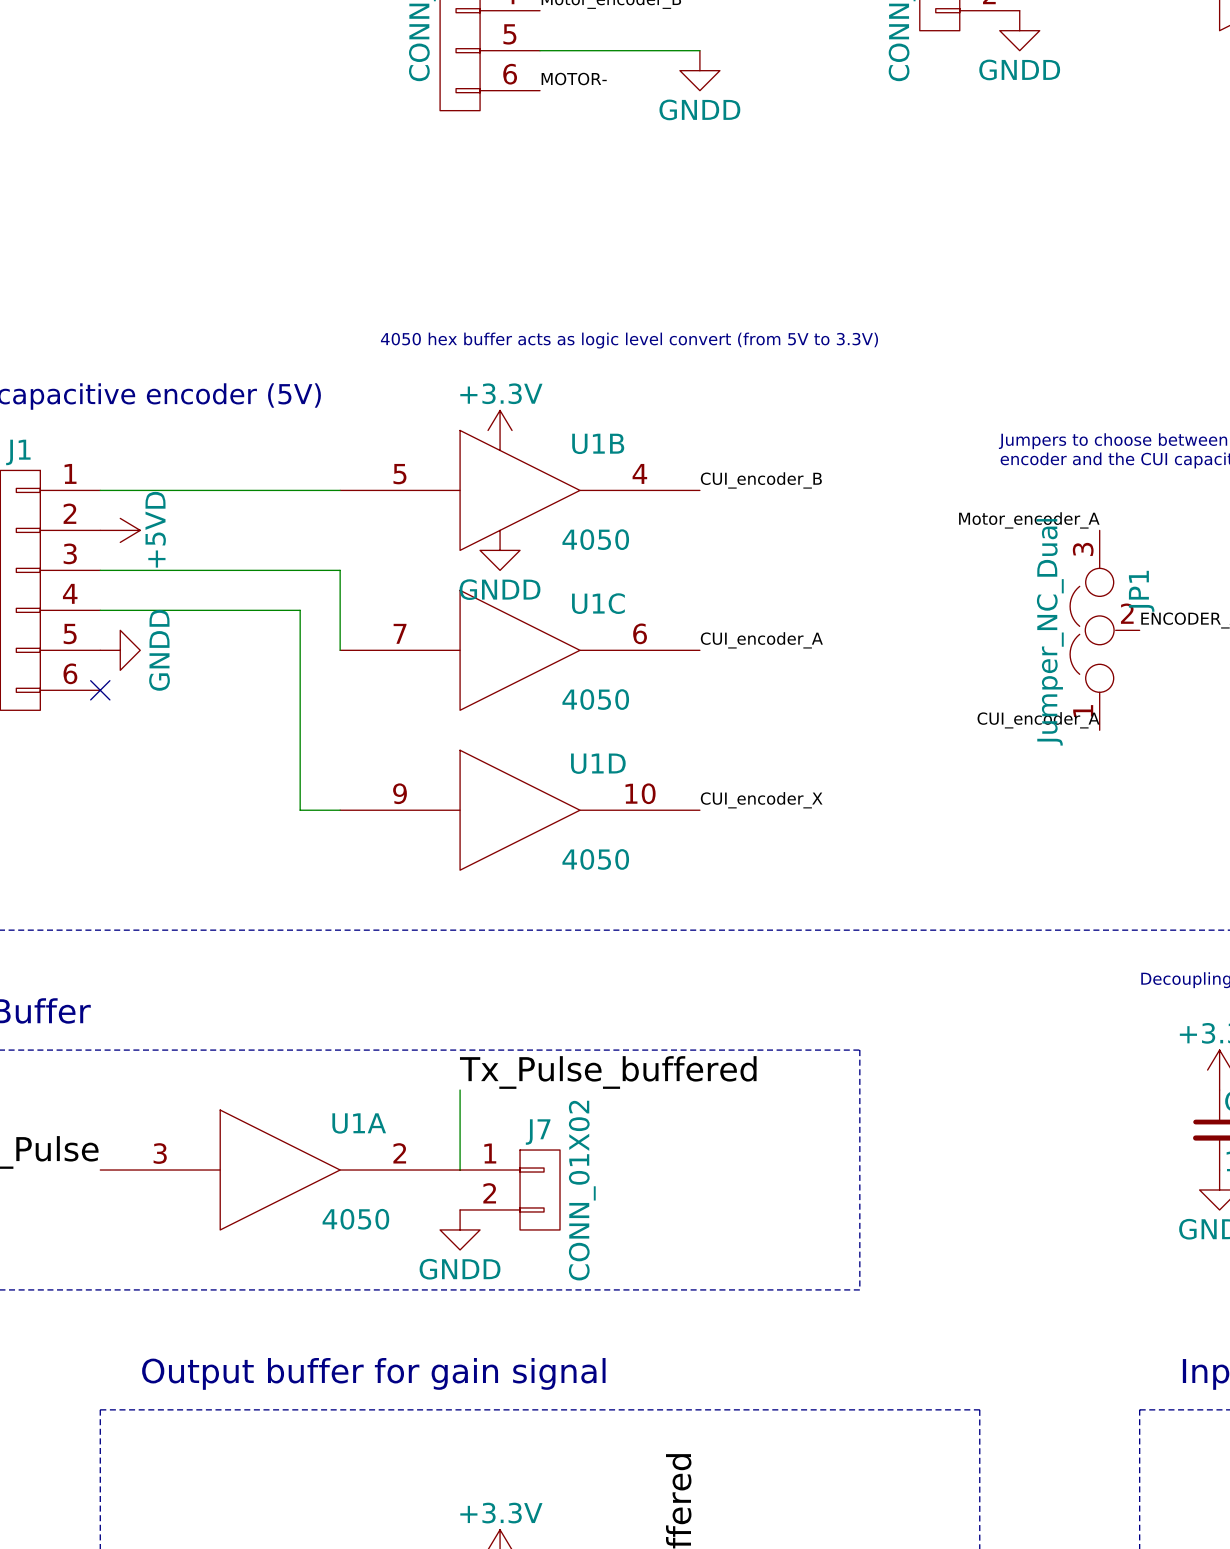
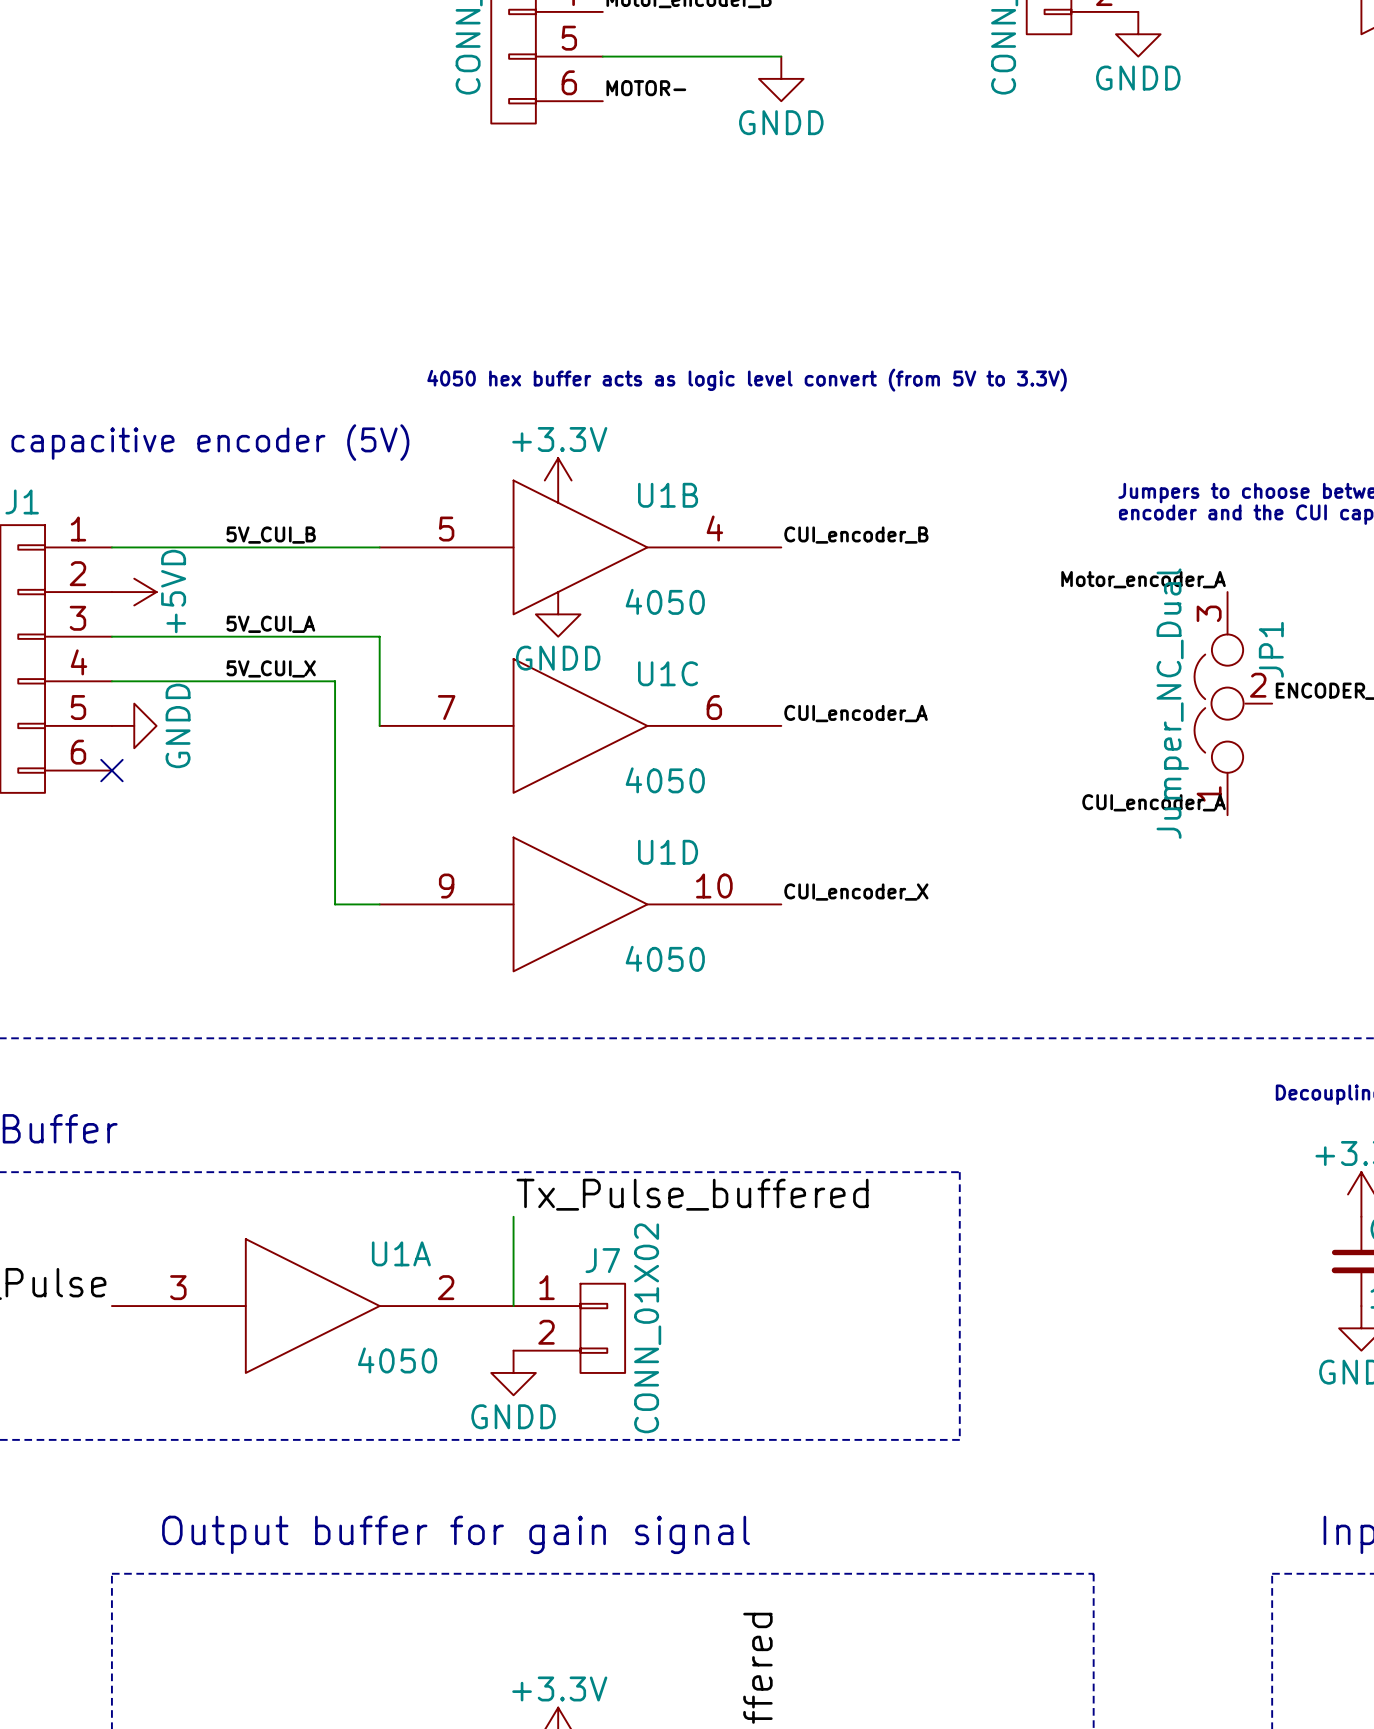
label: none -> 5V_CUI_B (271, 535)
label: none -> 5V_CUI_A (270, 624)
label: none -> 5V_CUI_X (271, 668)

